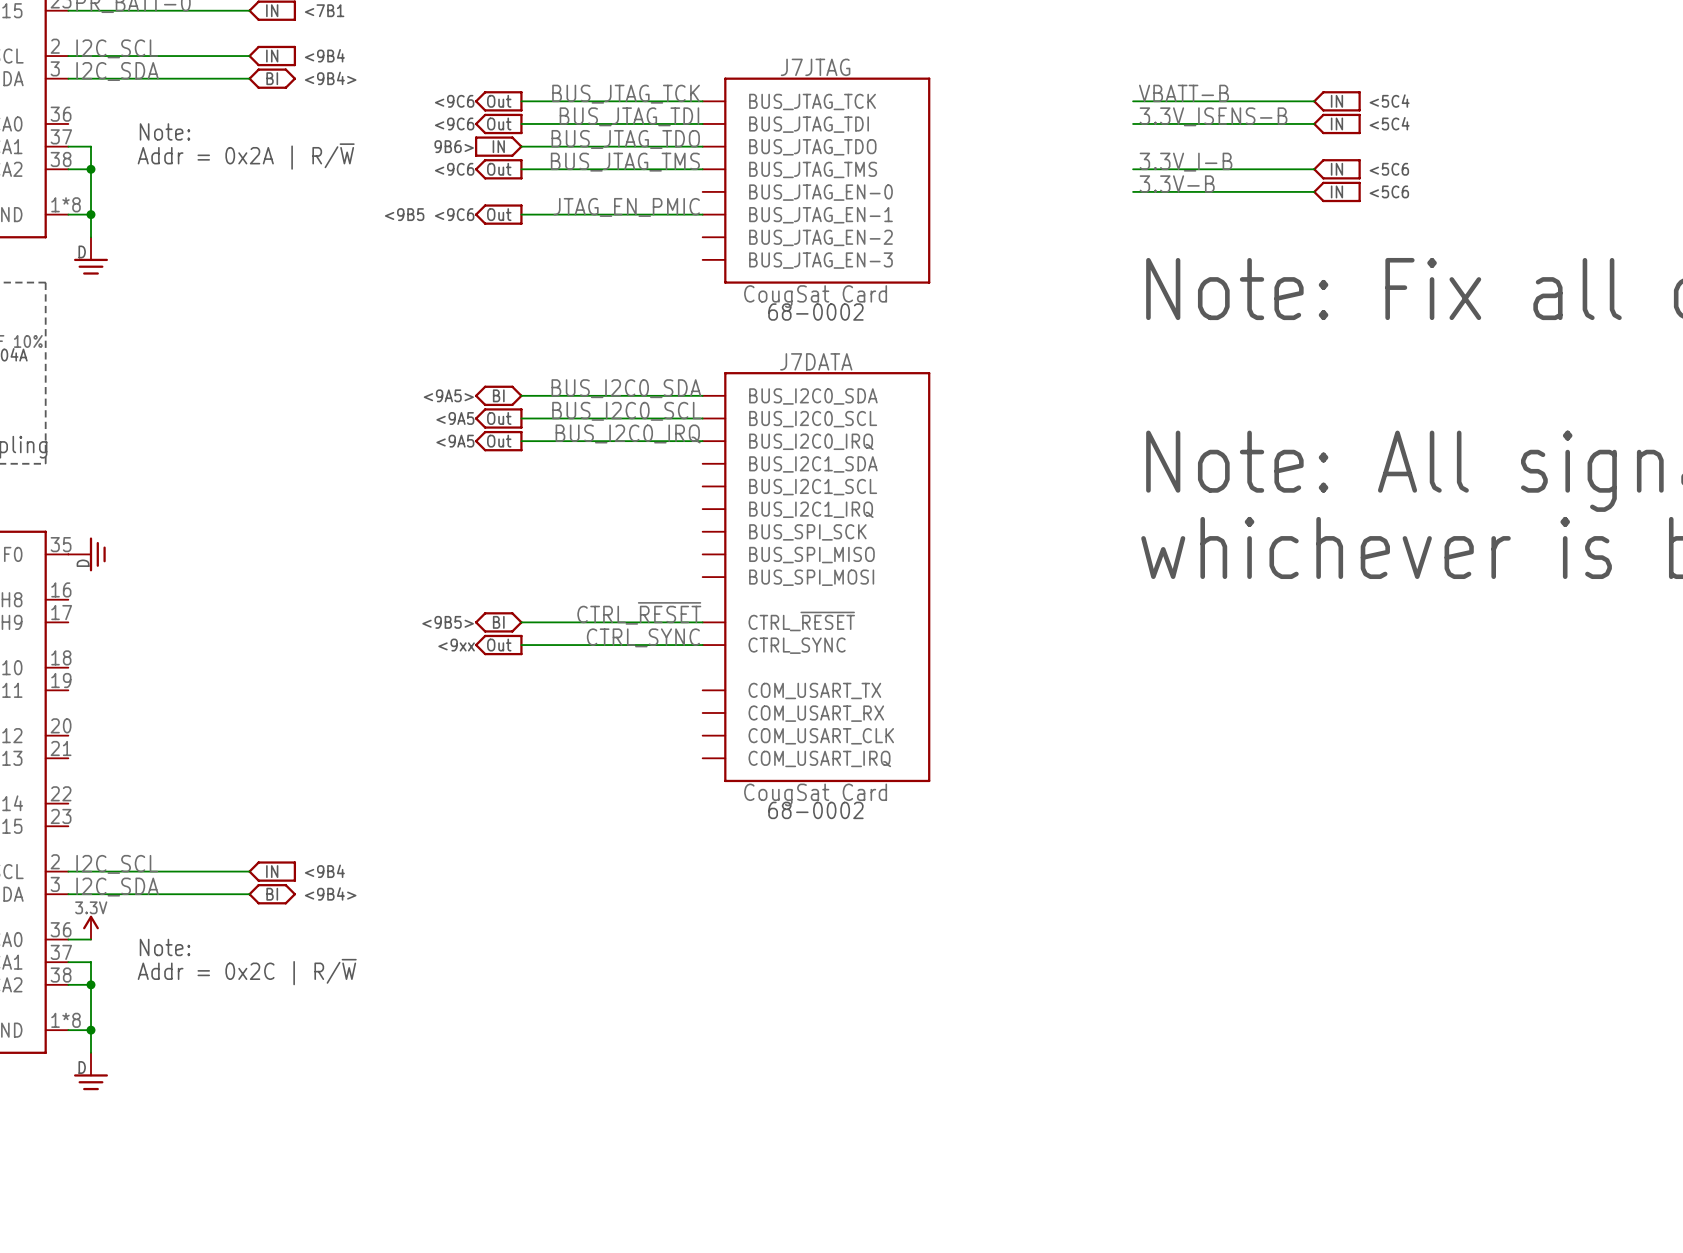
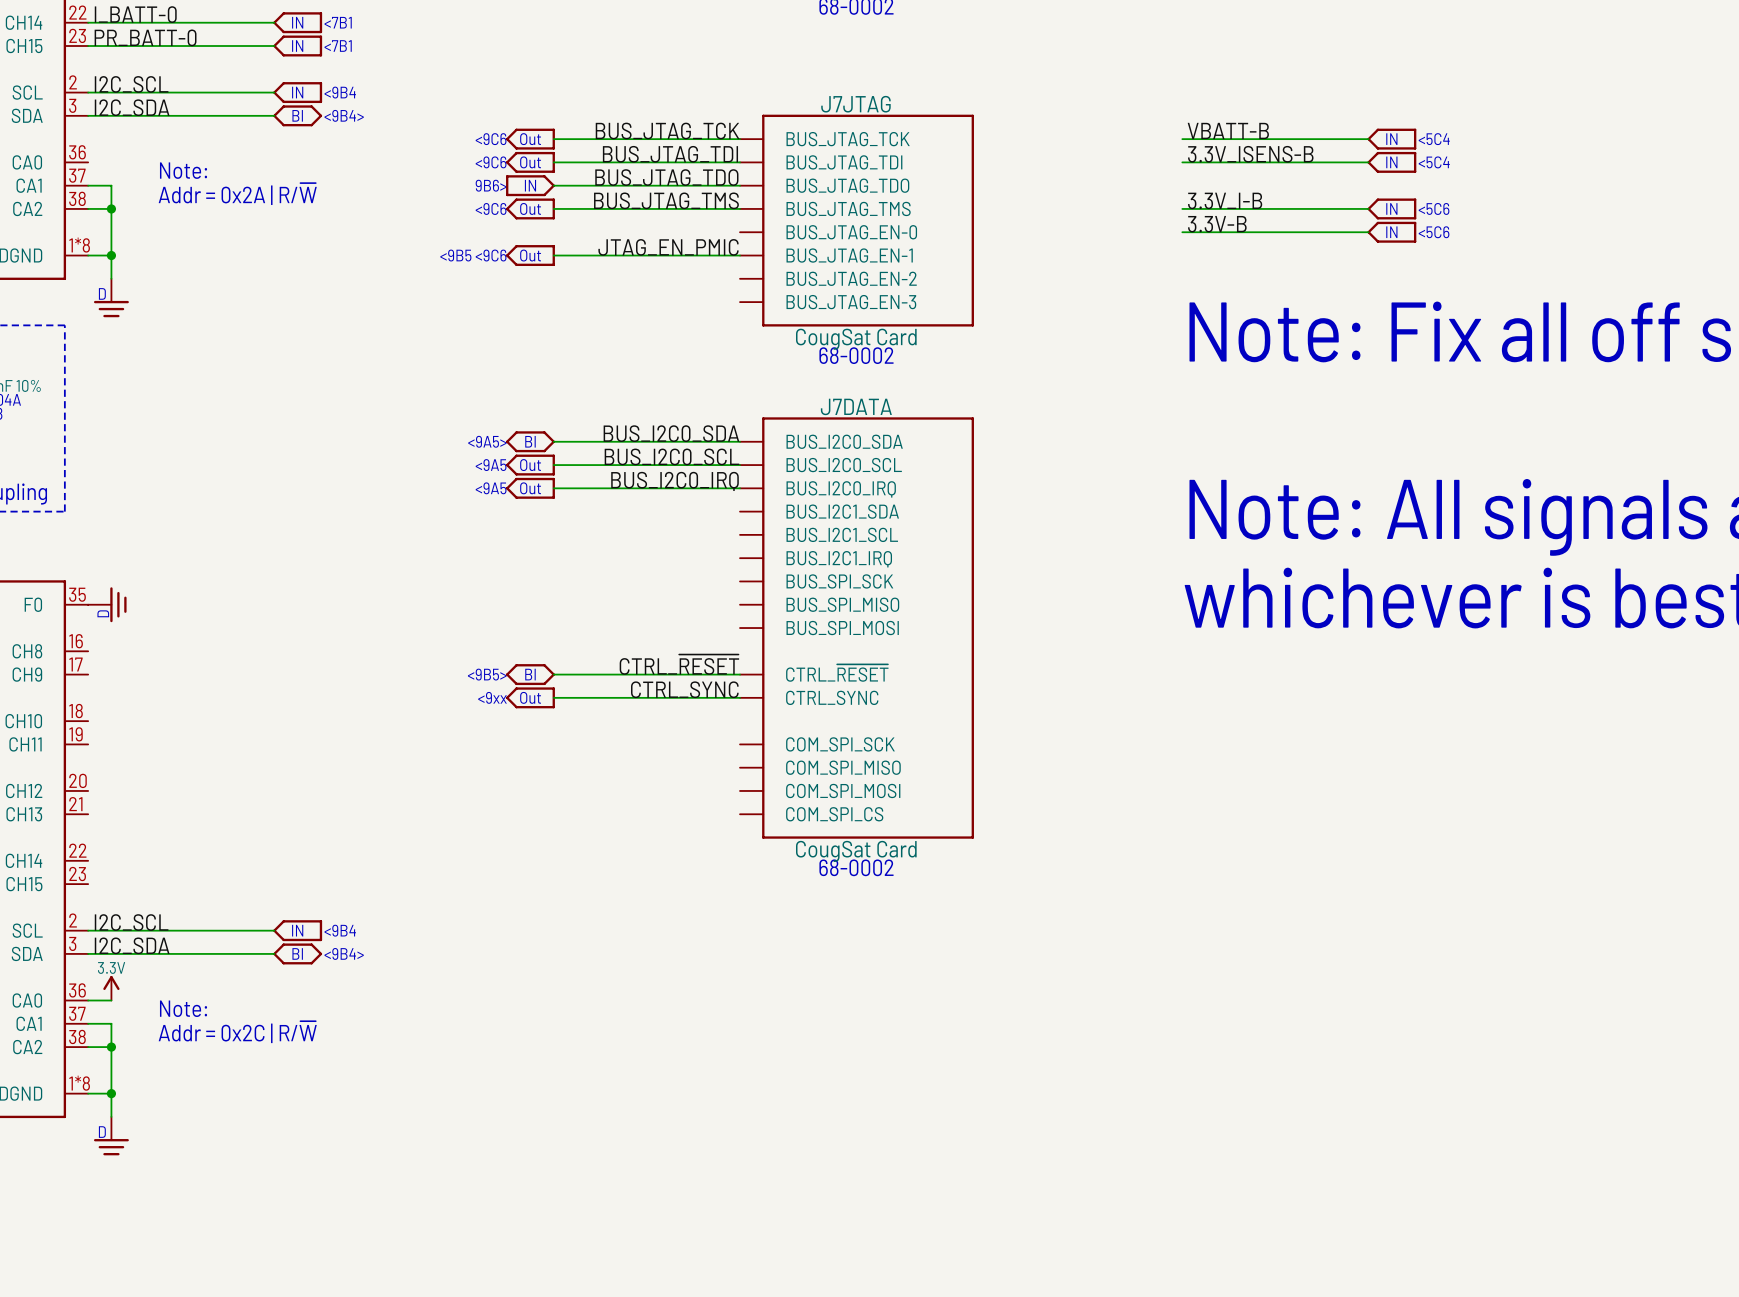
J7DATA pin name: COM_USART_TX (814, 690) -> COM_SPI_SCK (840, 744)
J7DATA pin name: COM_USART_RX (816, 713) -> COM_SPI_MISO (843, 767)
J7DATA pin name: COM_USART_CLK (821, 736) -> COM_SPI_MOSI (843, 790)
J7DATA pin name: COM_USART_IRQ (819, 758) -> COM_SPI_CS (834, 814)

